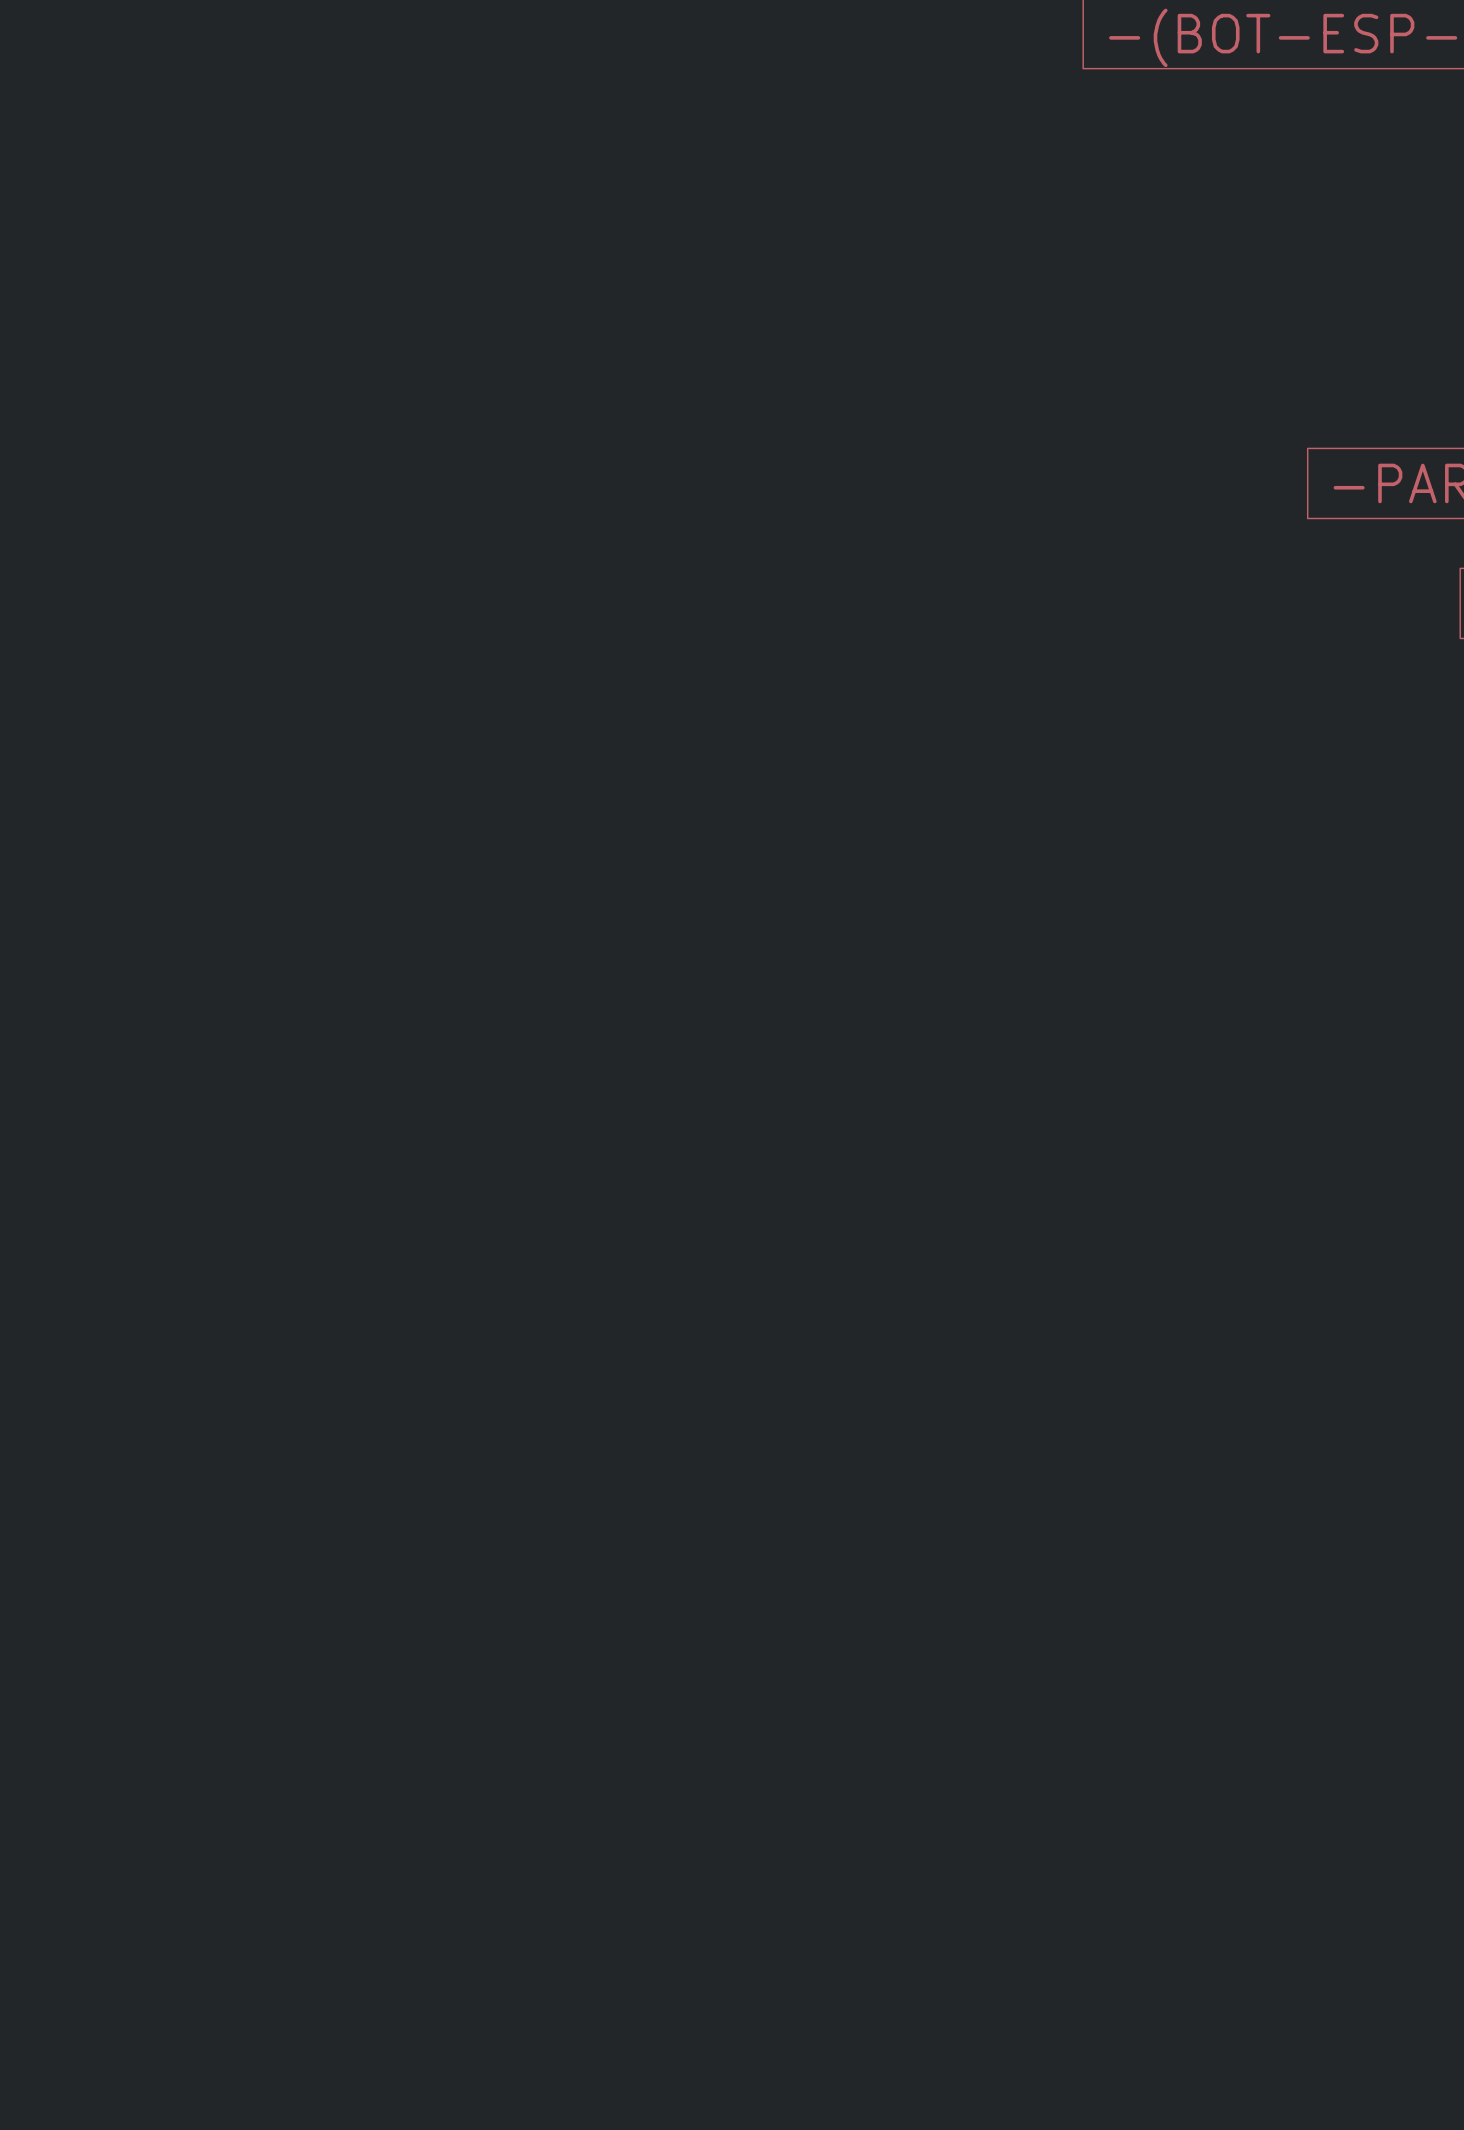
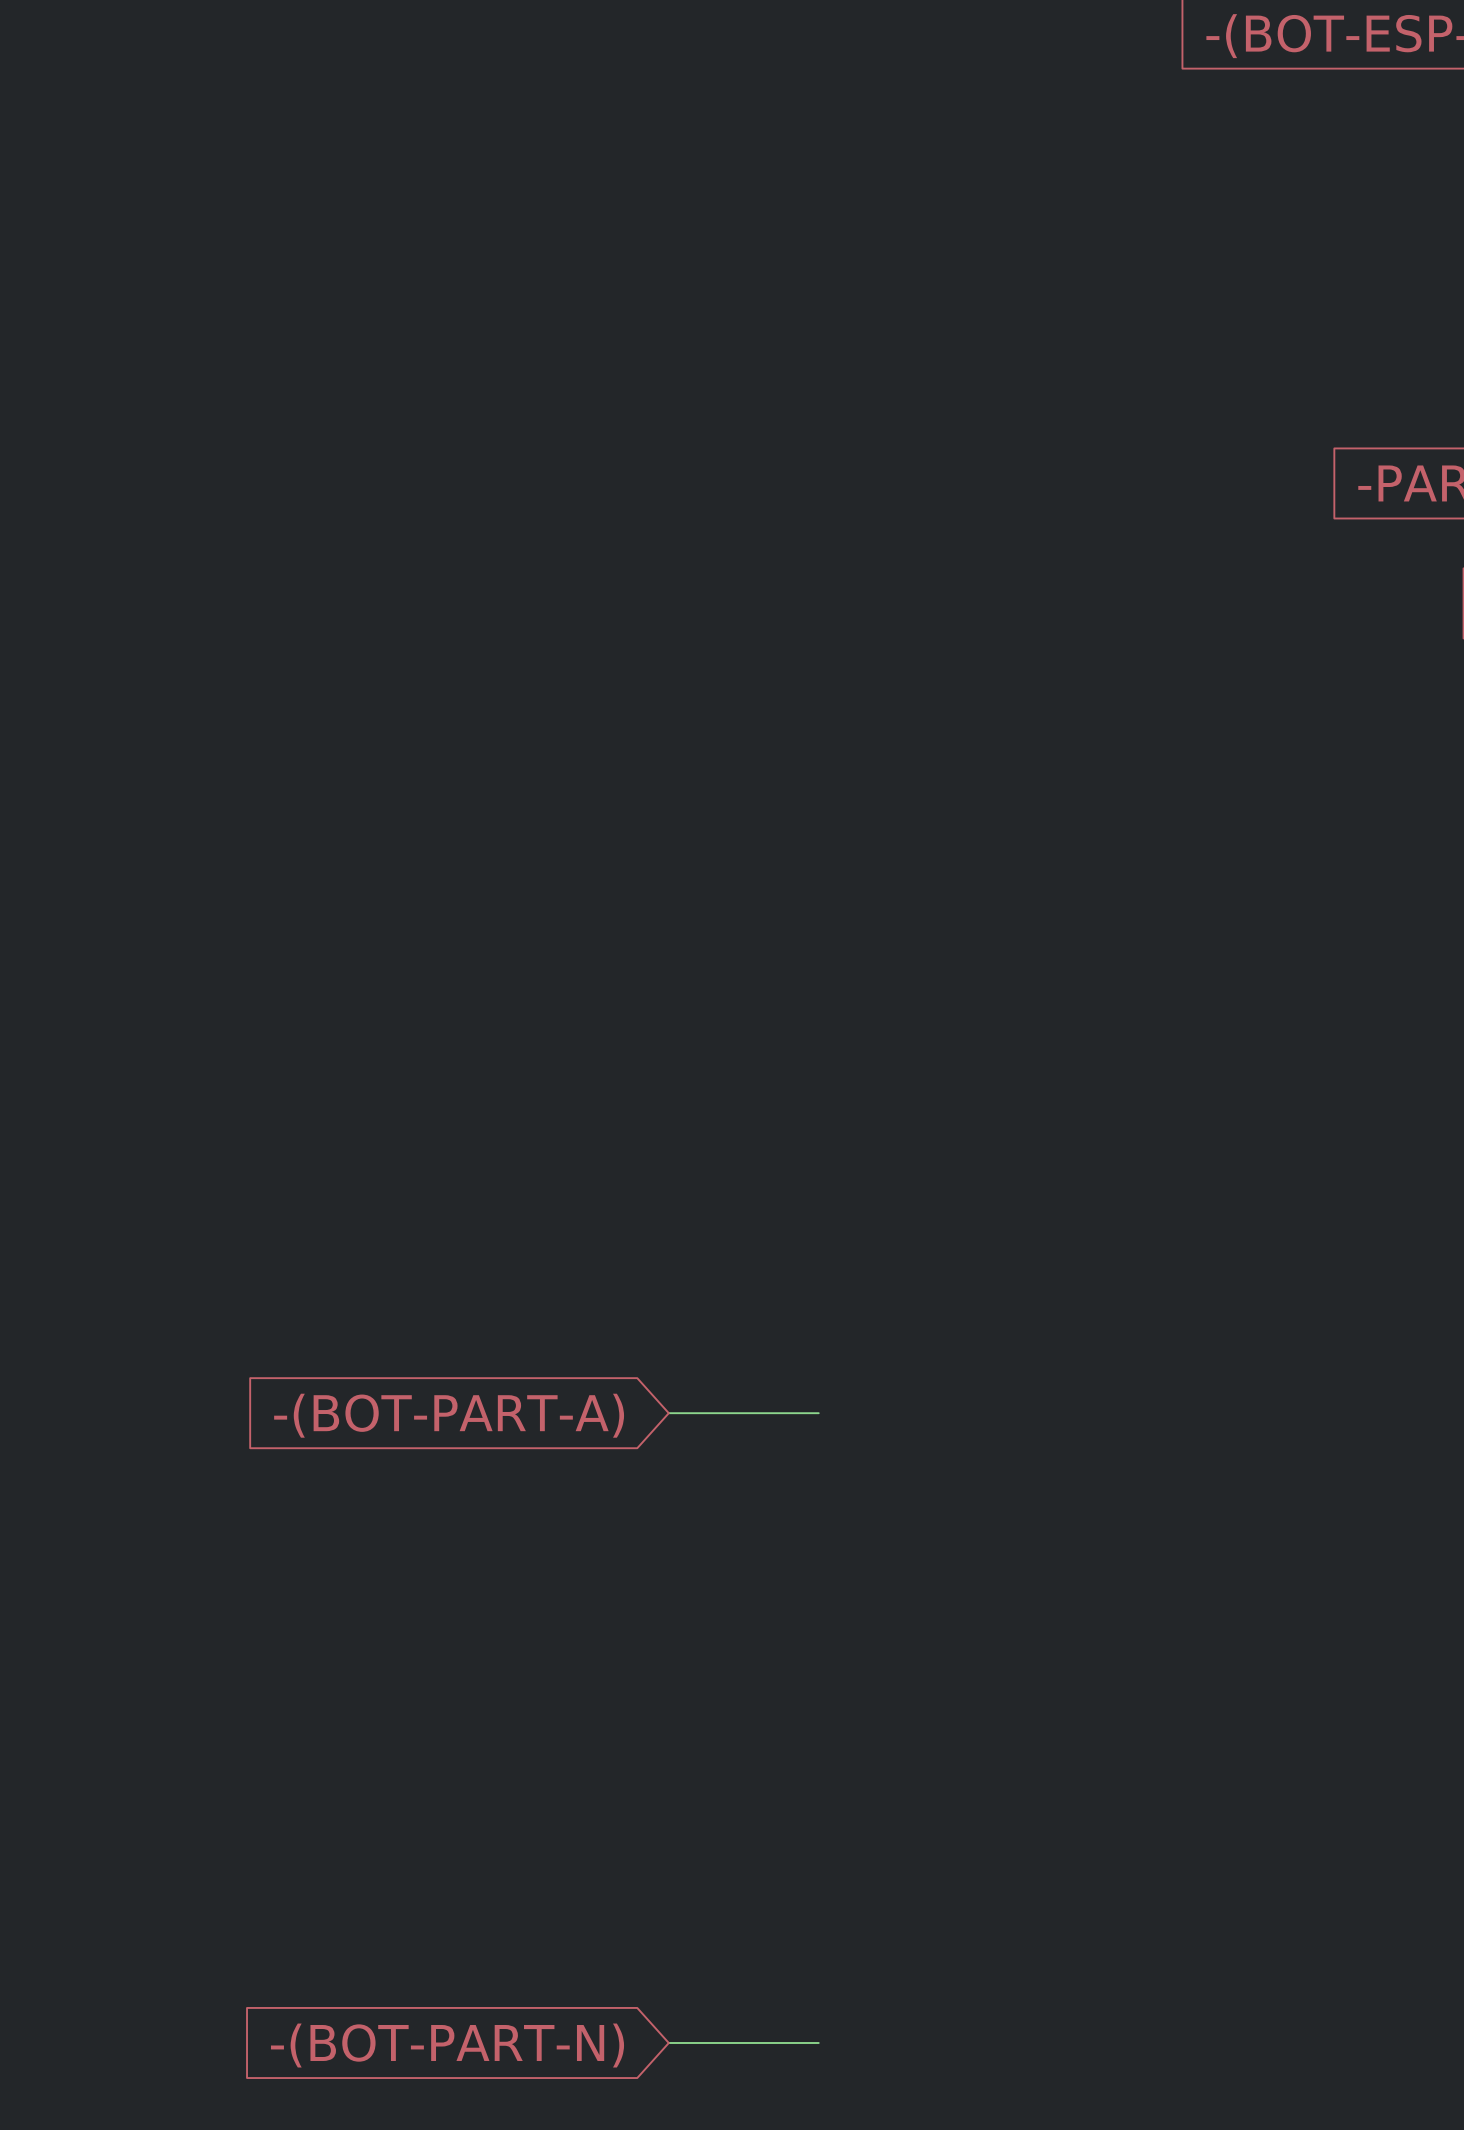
wire: none -> (668, 1413) (818, 1413)
global label: none -> -(BOT-PART-A) (449, 1415)
wire: none -> (668, 2042) (818, 2042)
global label: none -> -(BOT-PART-N) (447, 2045)

